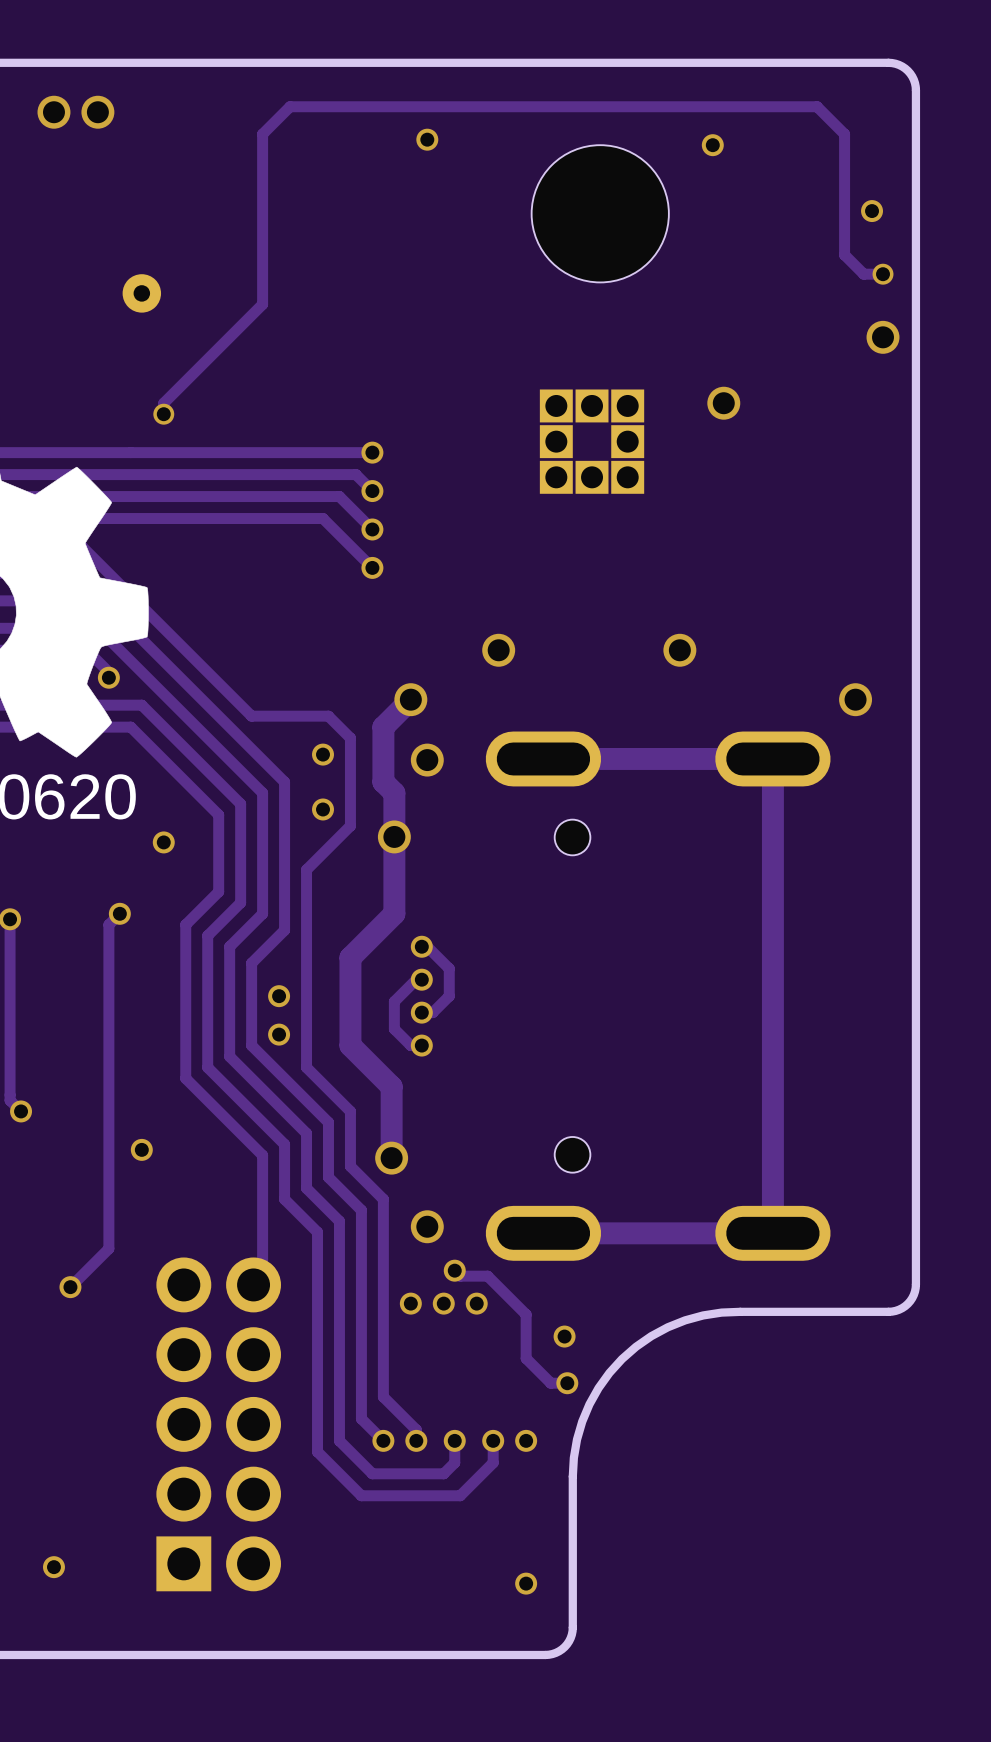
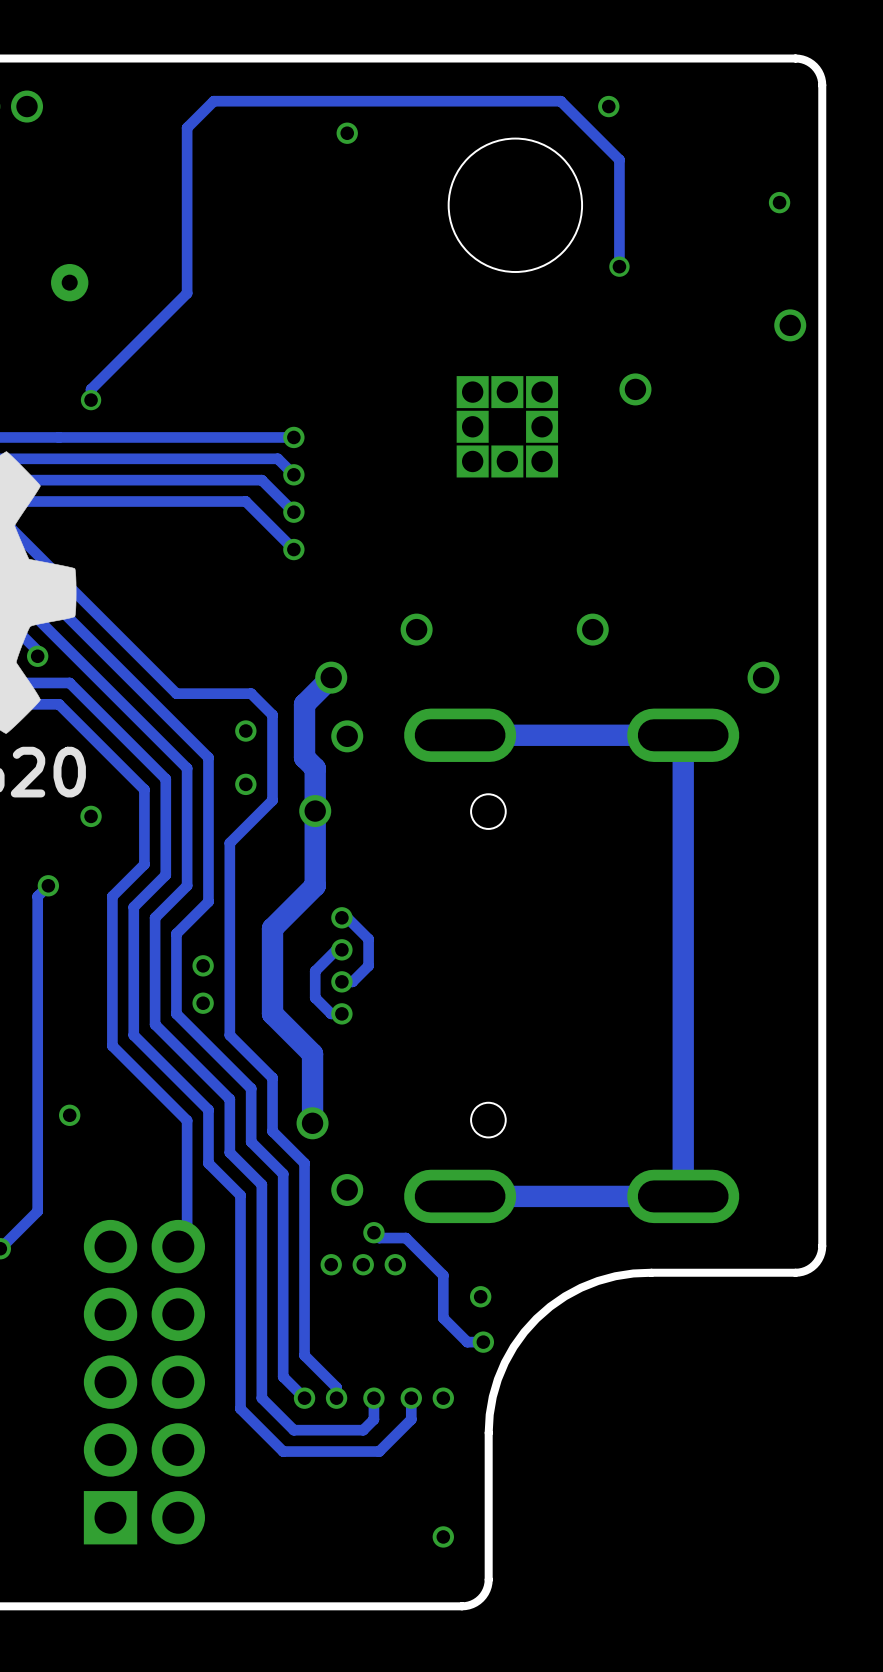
track: (646, 106) (817, 106) (844, 134) (844, 254) (863, 274) (883, 274) -> (560, 101) (619, 159) (619, 266)
via position: (712, 145) -> (608, 106)
via position: (883, 274) -> (619, 266)

